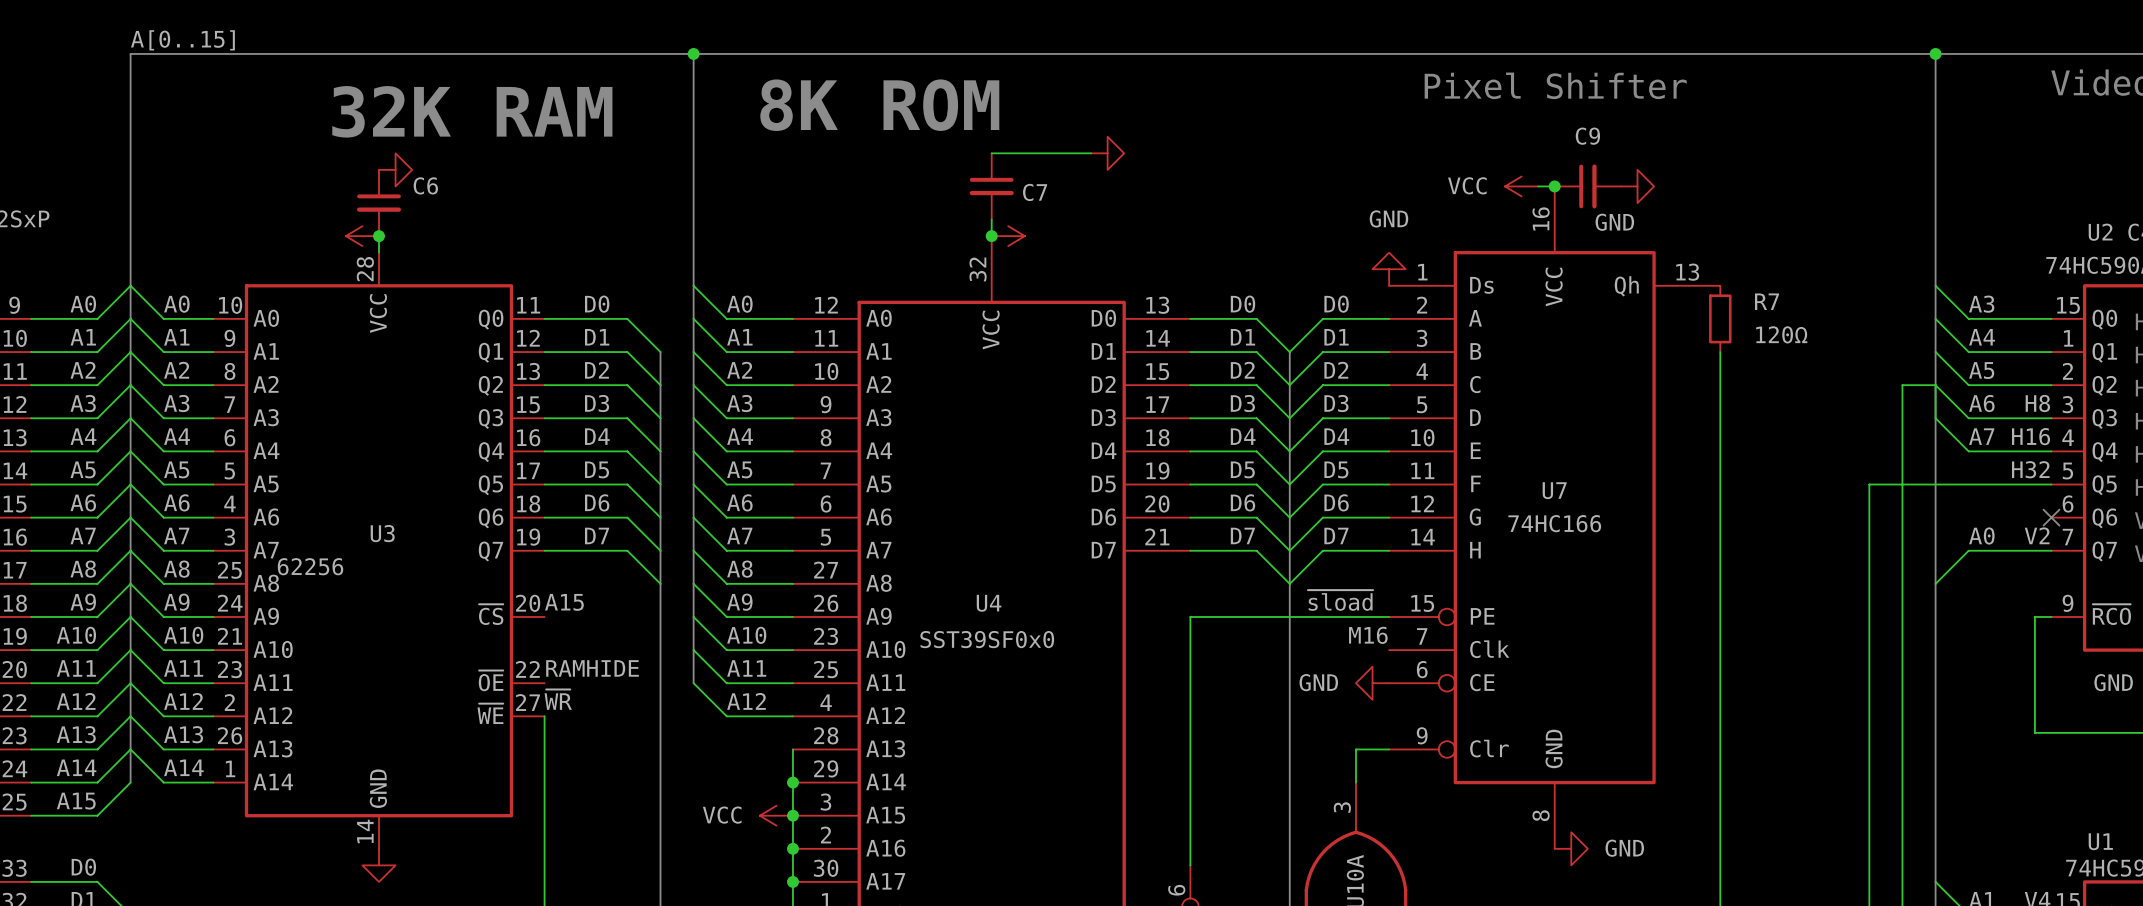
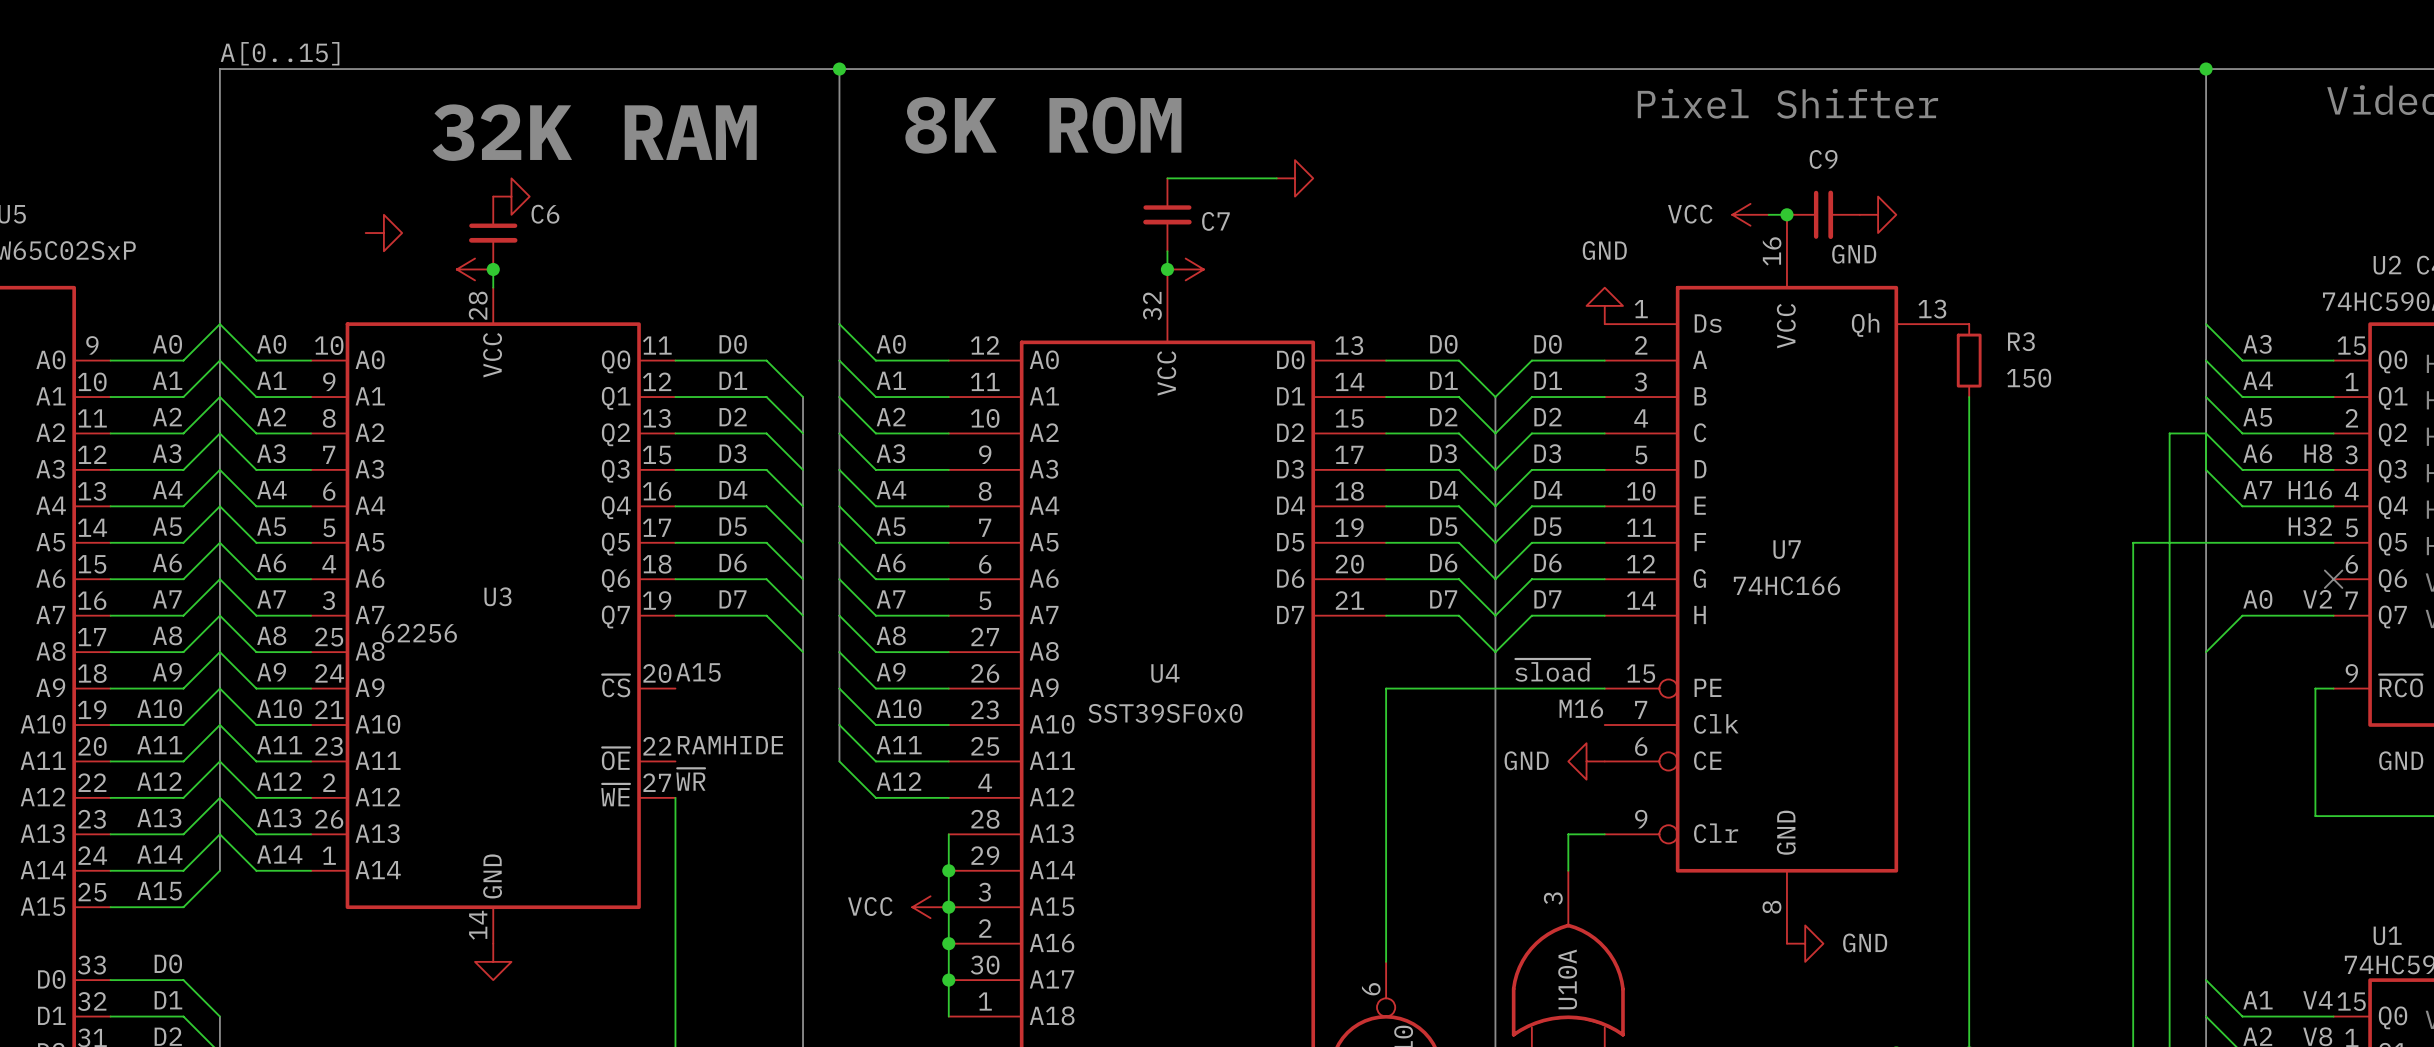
power symbol: none -> (383, 233)
R7 name: R7 (1767, 301) -> R3 (2021, 341)
R7 value: 120Ω (1781, 334) -> 150 (2029, 378)

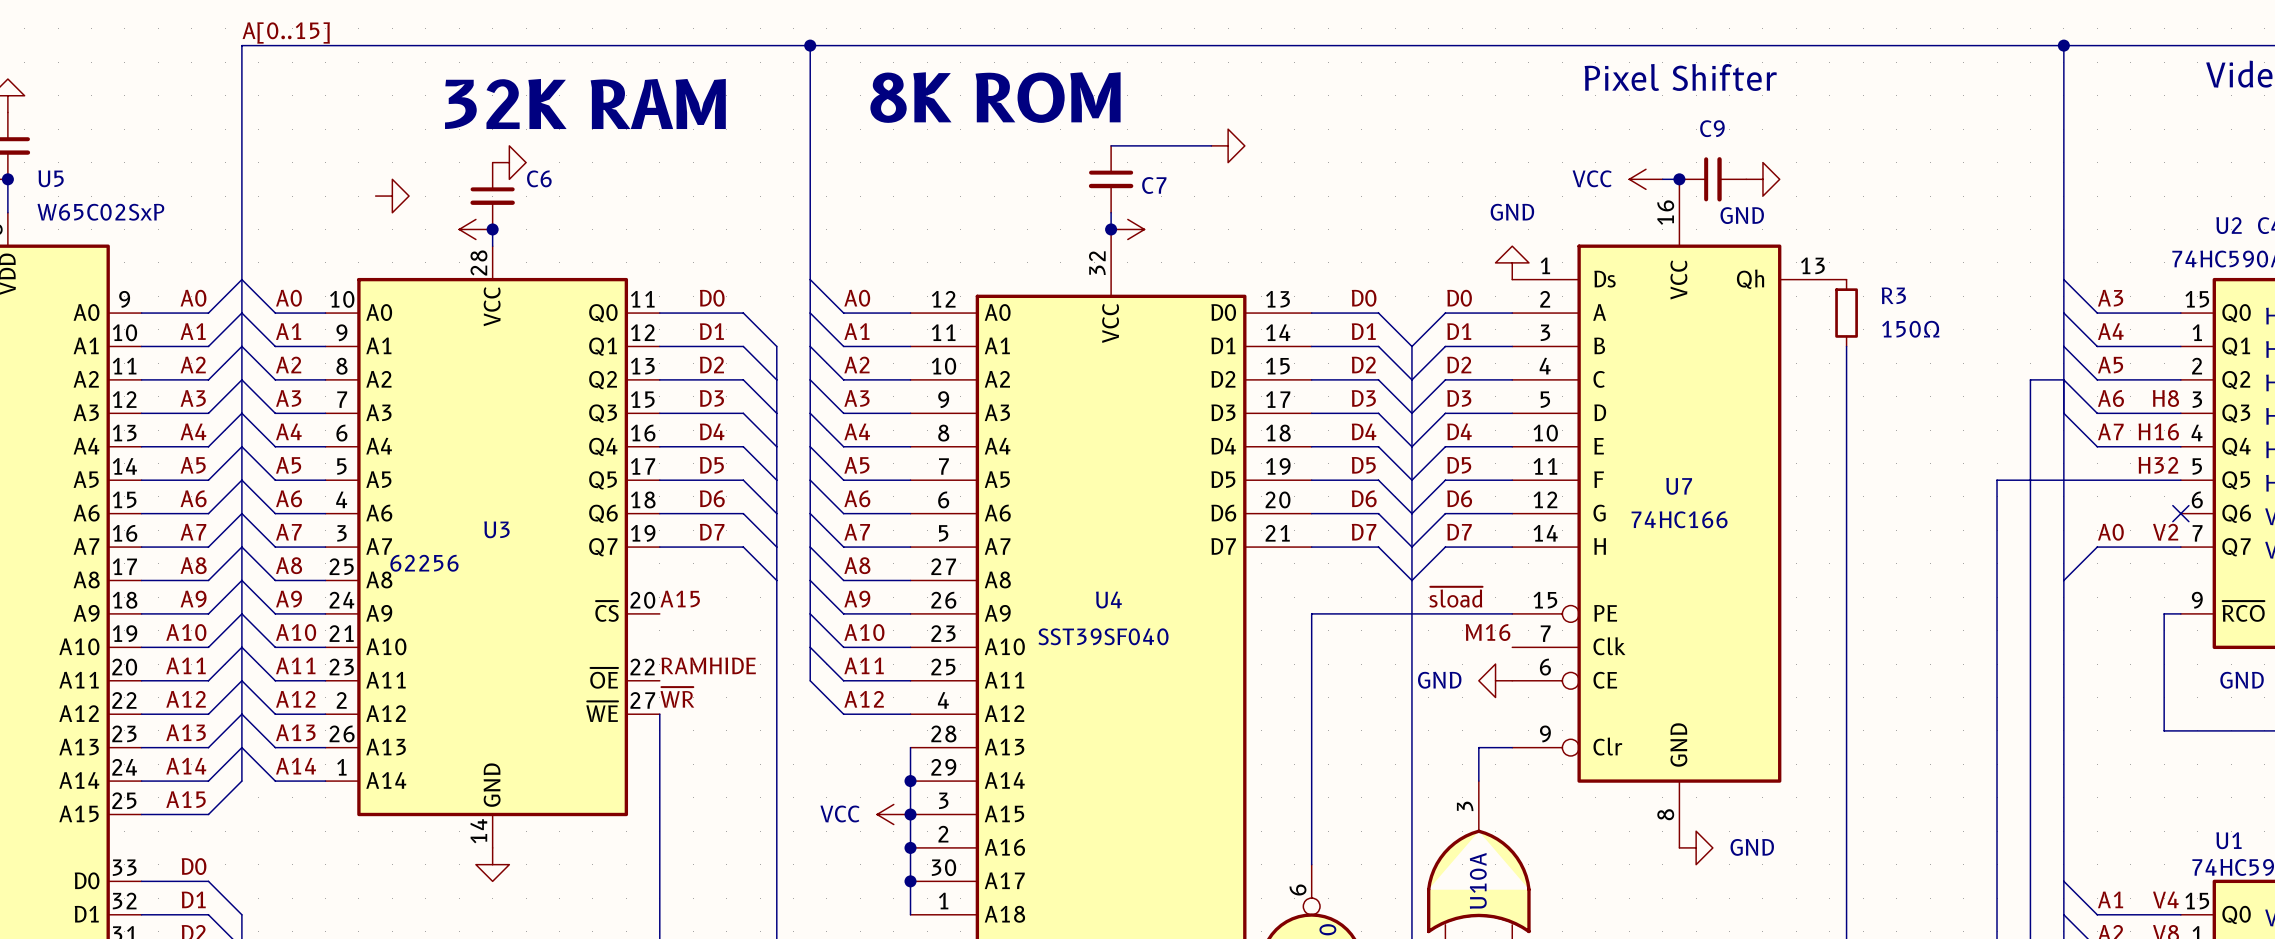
R3 value: 150 (2029, 378) -> 150Ω (1910, 329)
U4 value: SST39SF0x0 (1165, 713) -> SST39SF040 (1103, 636)

